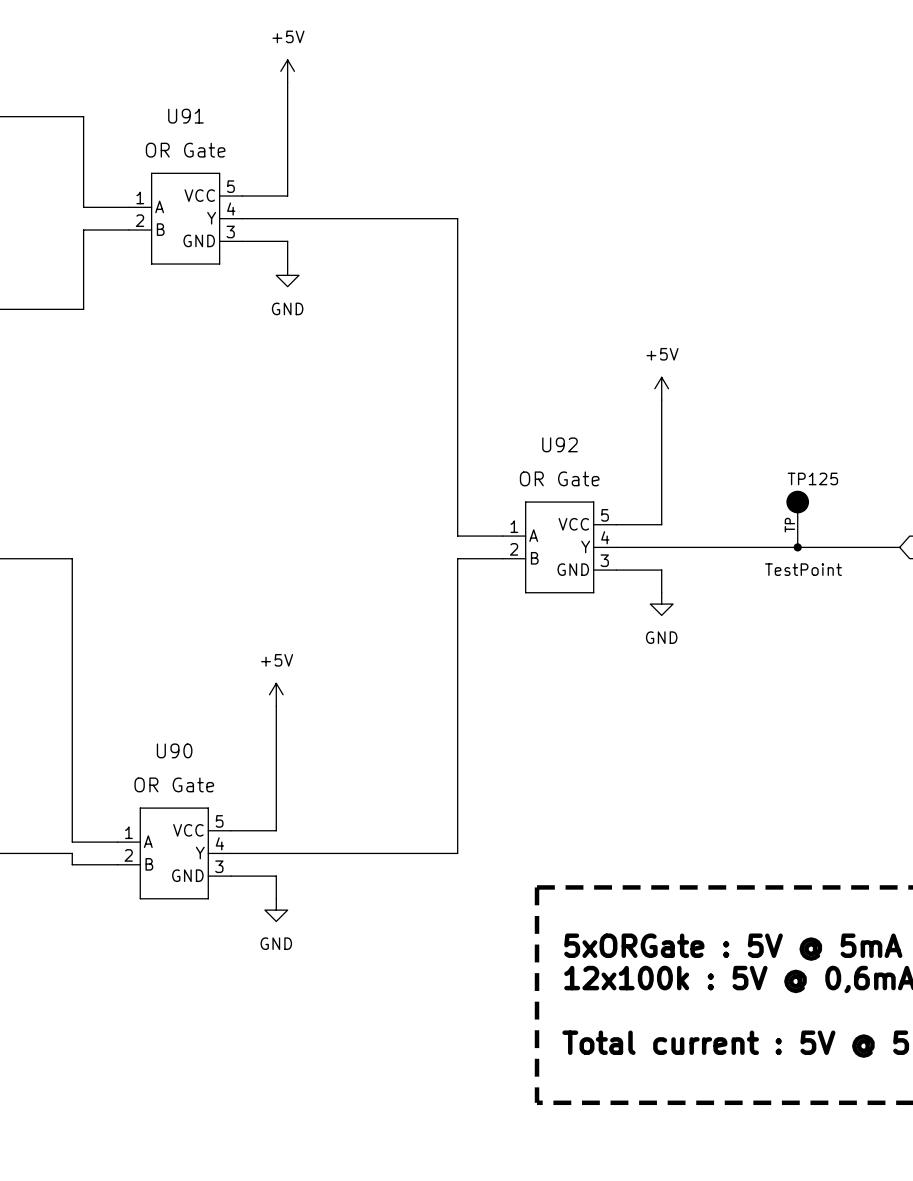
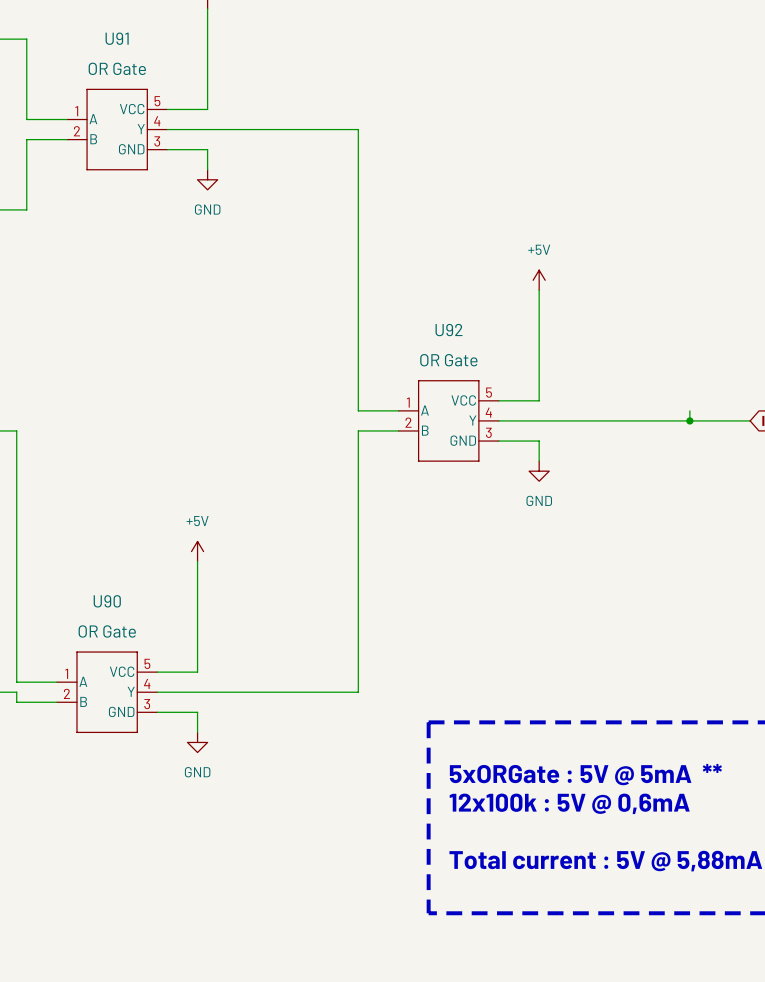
TP125: TestPoint (797, 519) -> none
wire: none -> (689, 410) (689, 420)
junction position: (797, 547) -> (689, 420)

